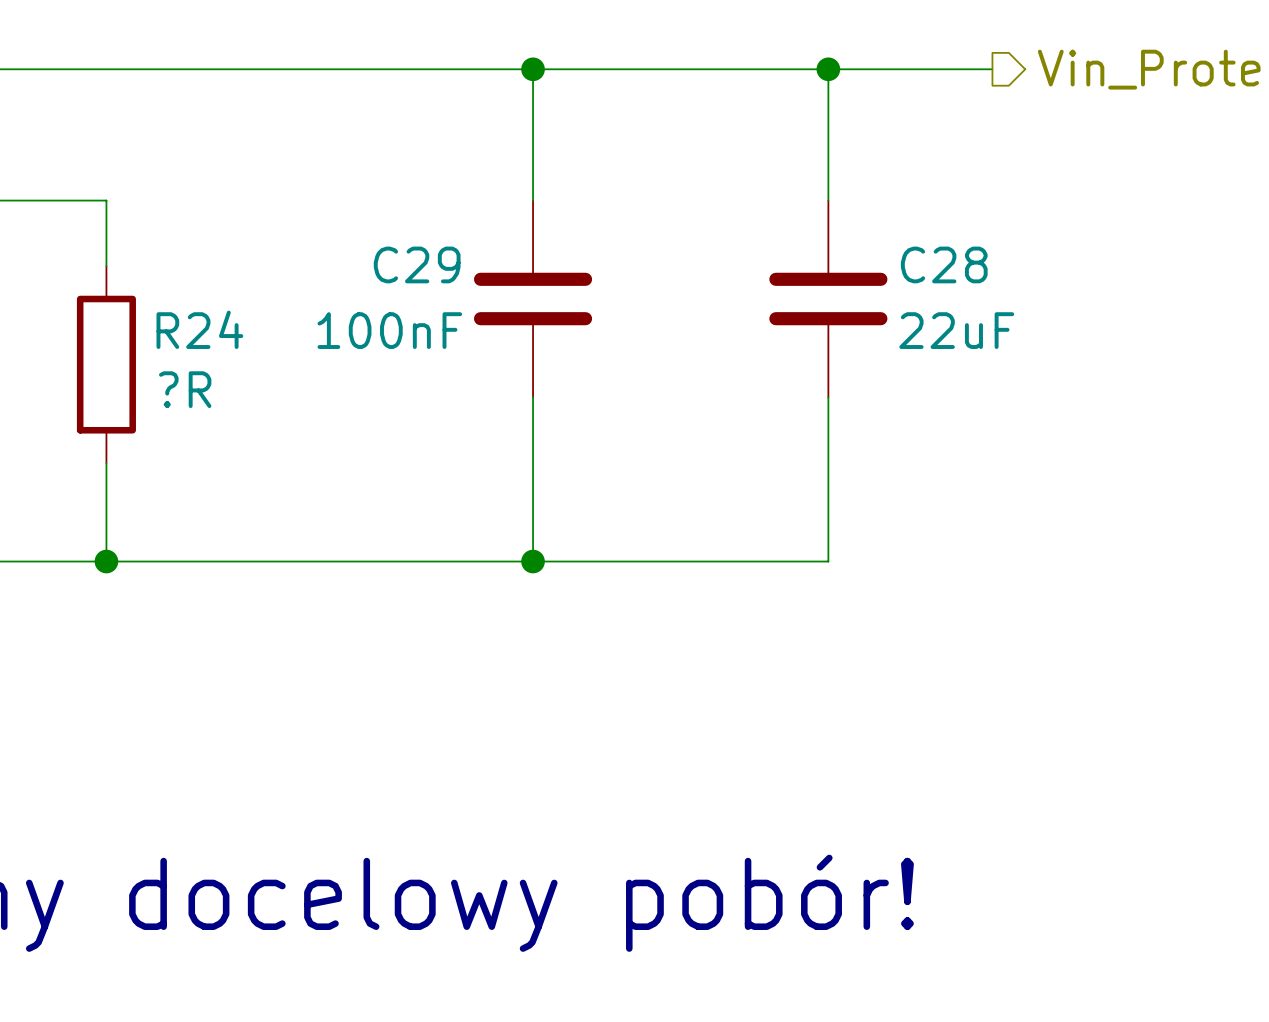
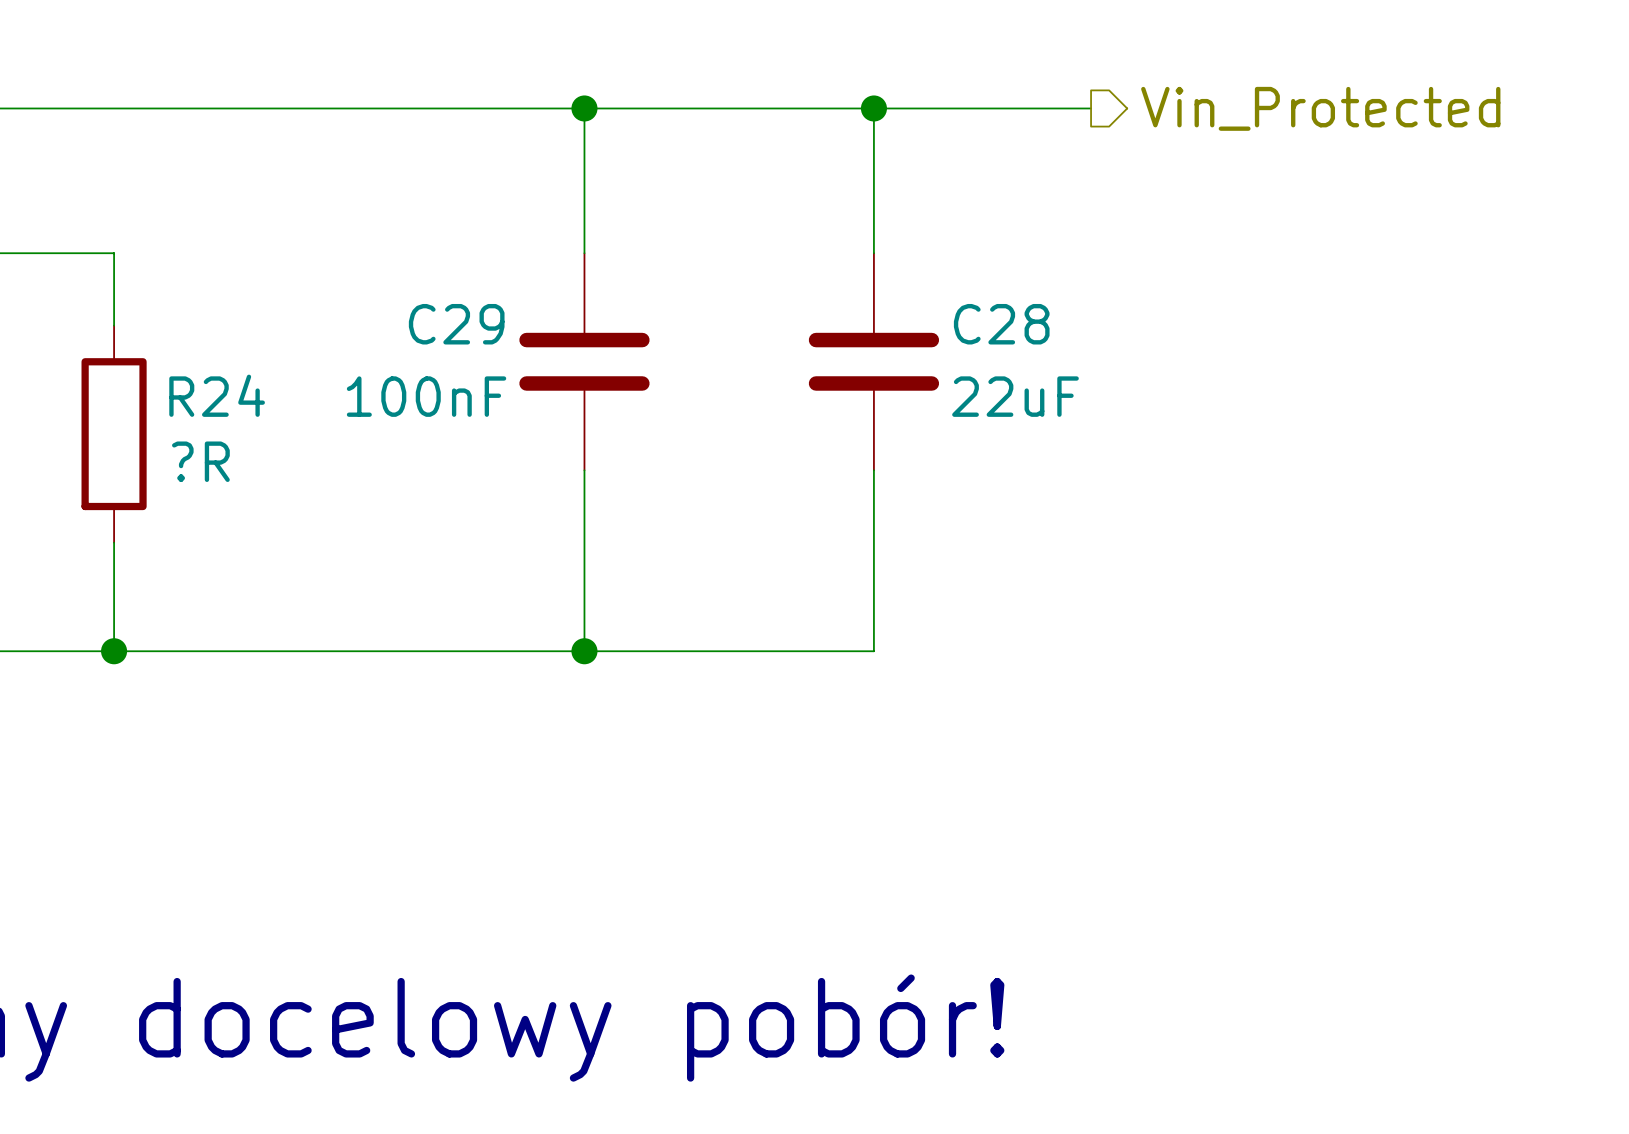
wire: (828, 69) (828, 200) -> (873, 108) (873, 253)
junction position: (828, 69) -> (873, 108)
C28 position: (828, 299) -> (873, 361)
wire: (828, 397) (828, 561) (795, 561) -> (873, 470) (873, 651)

